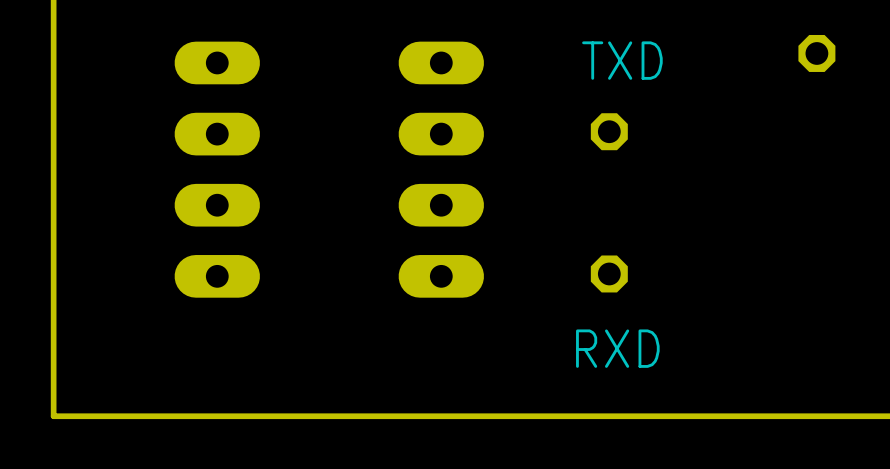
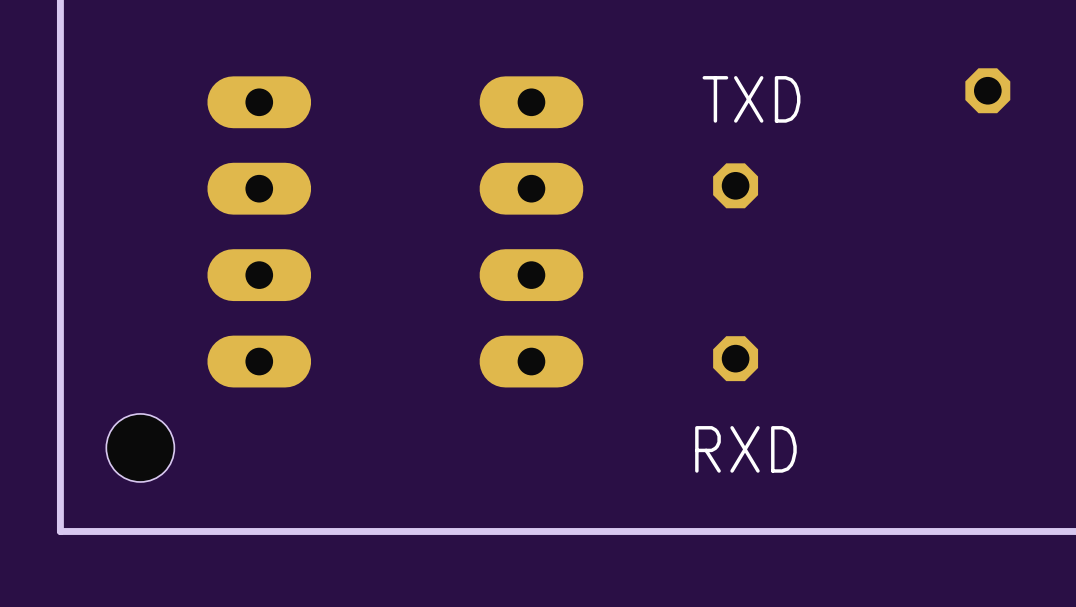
hole: none -> (140, 447)

